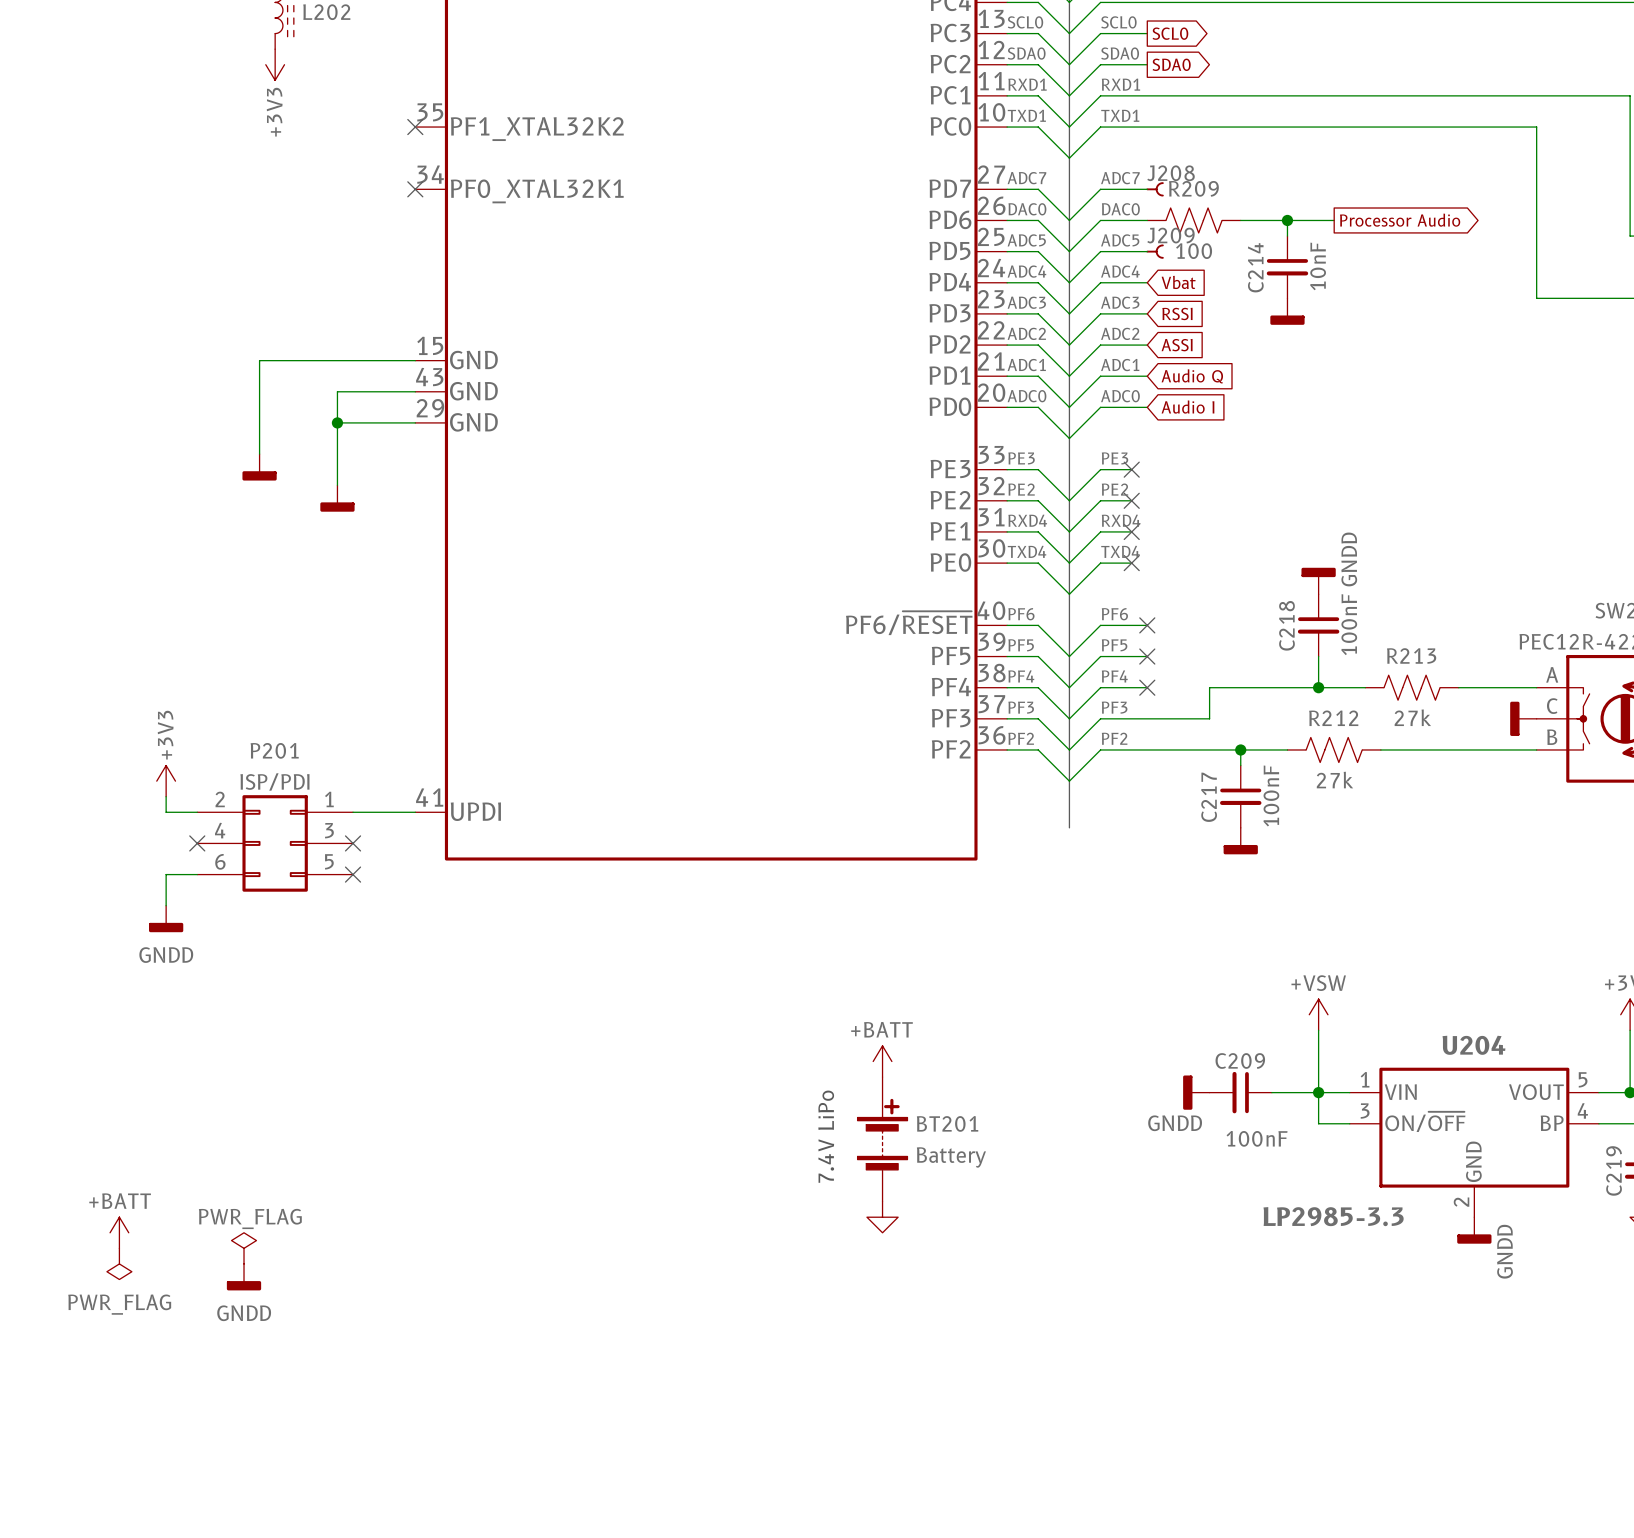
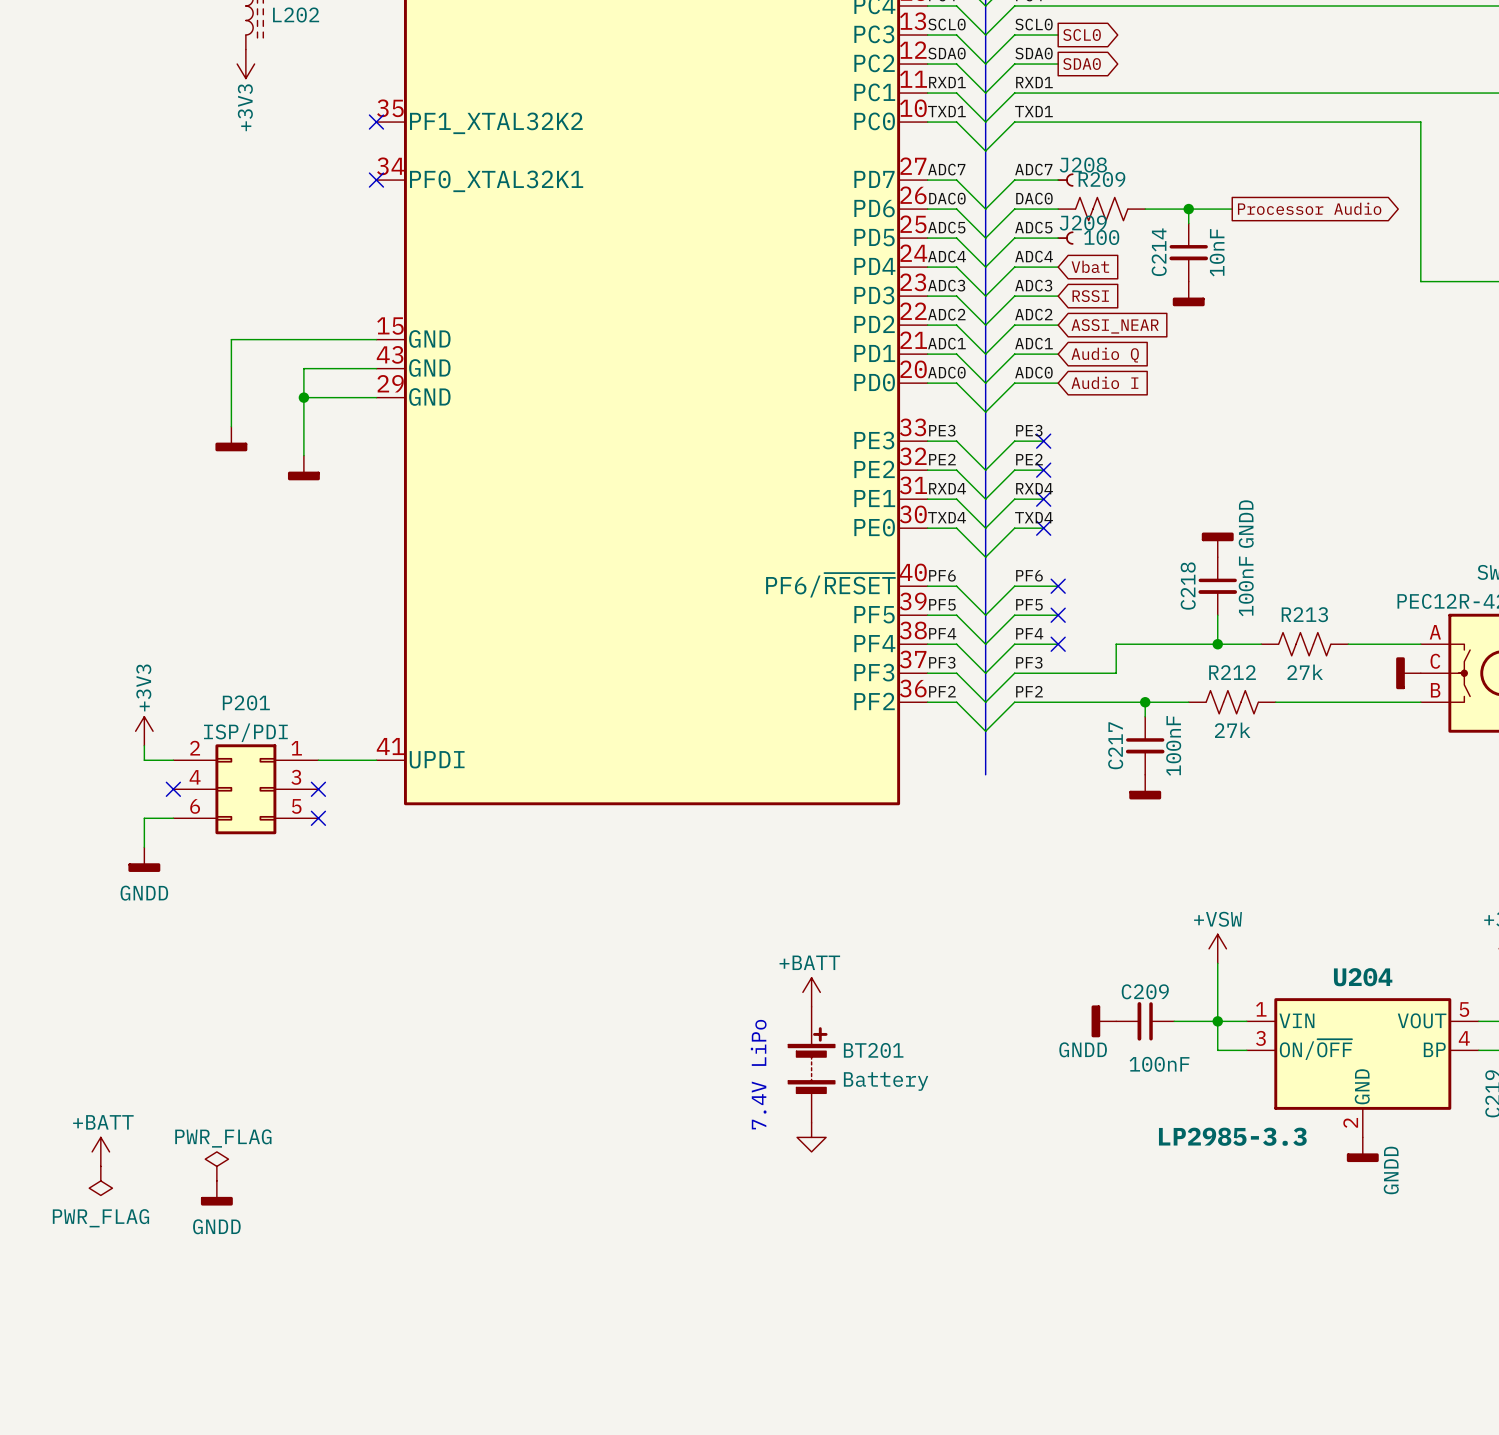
global label: ASSI (1177, 345) -> ASSI_NEAR (1115, 326)

